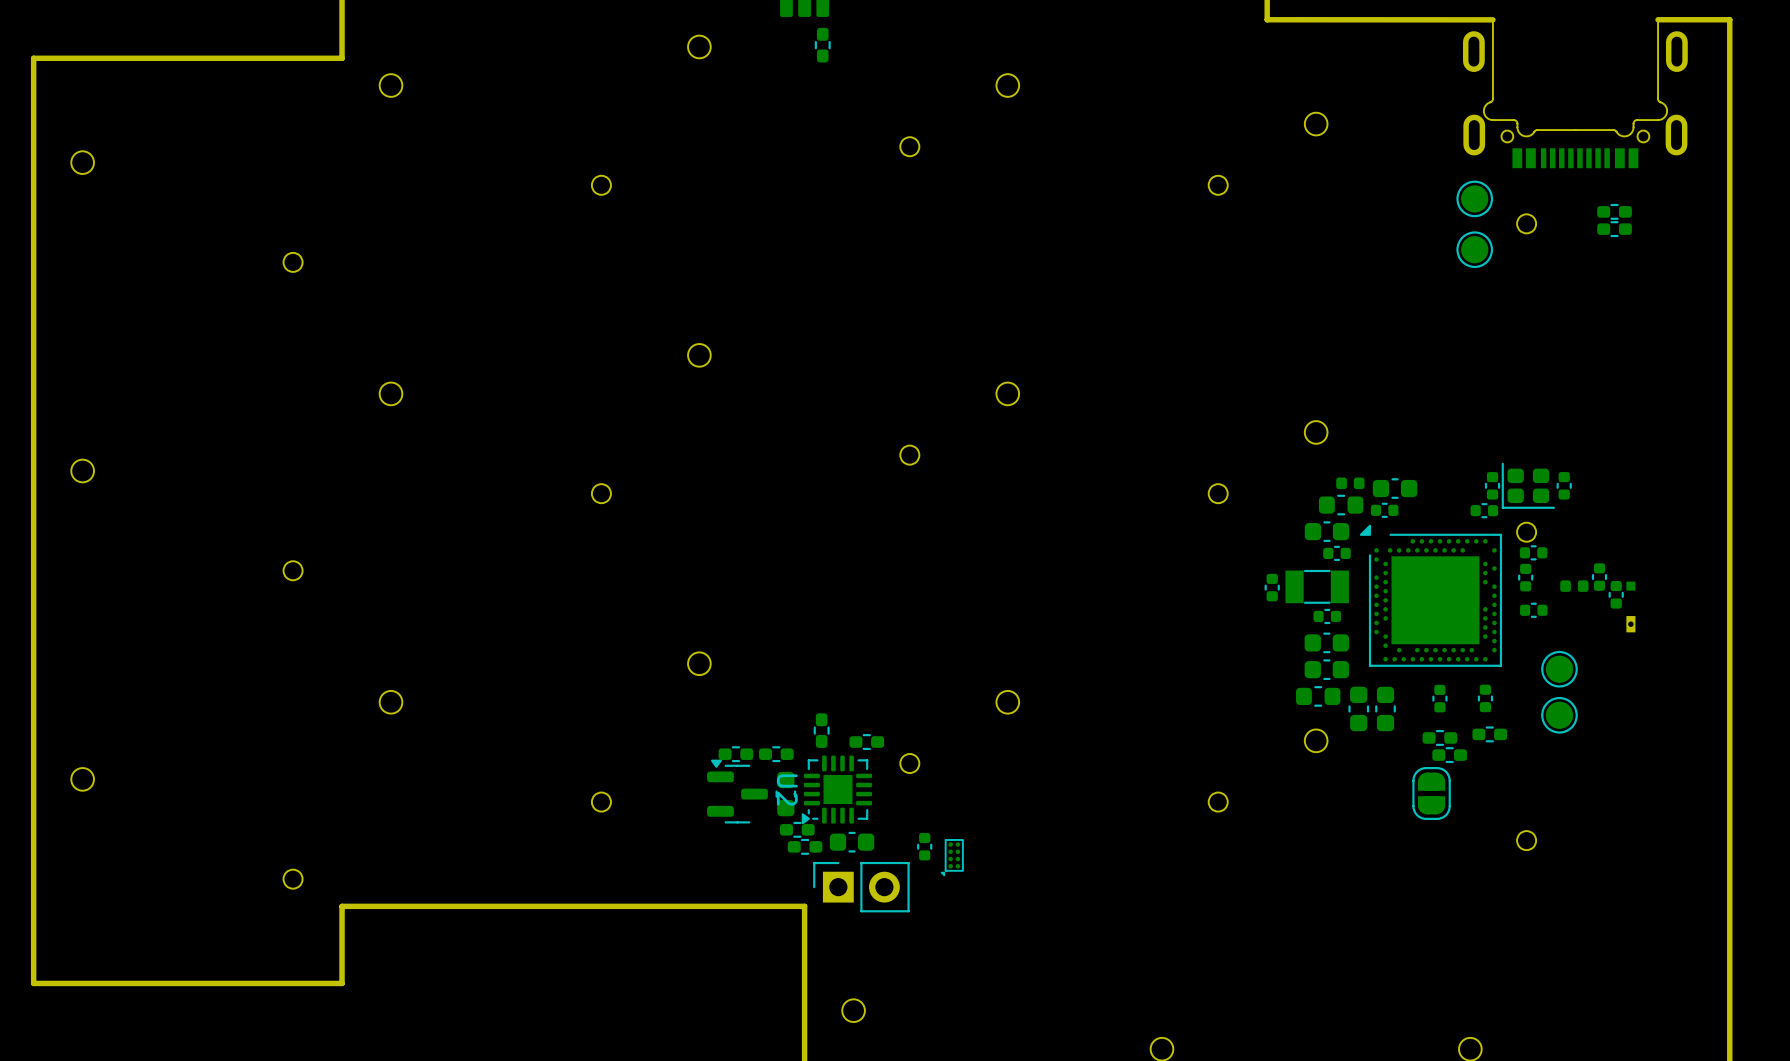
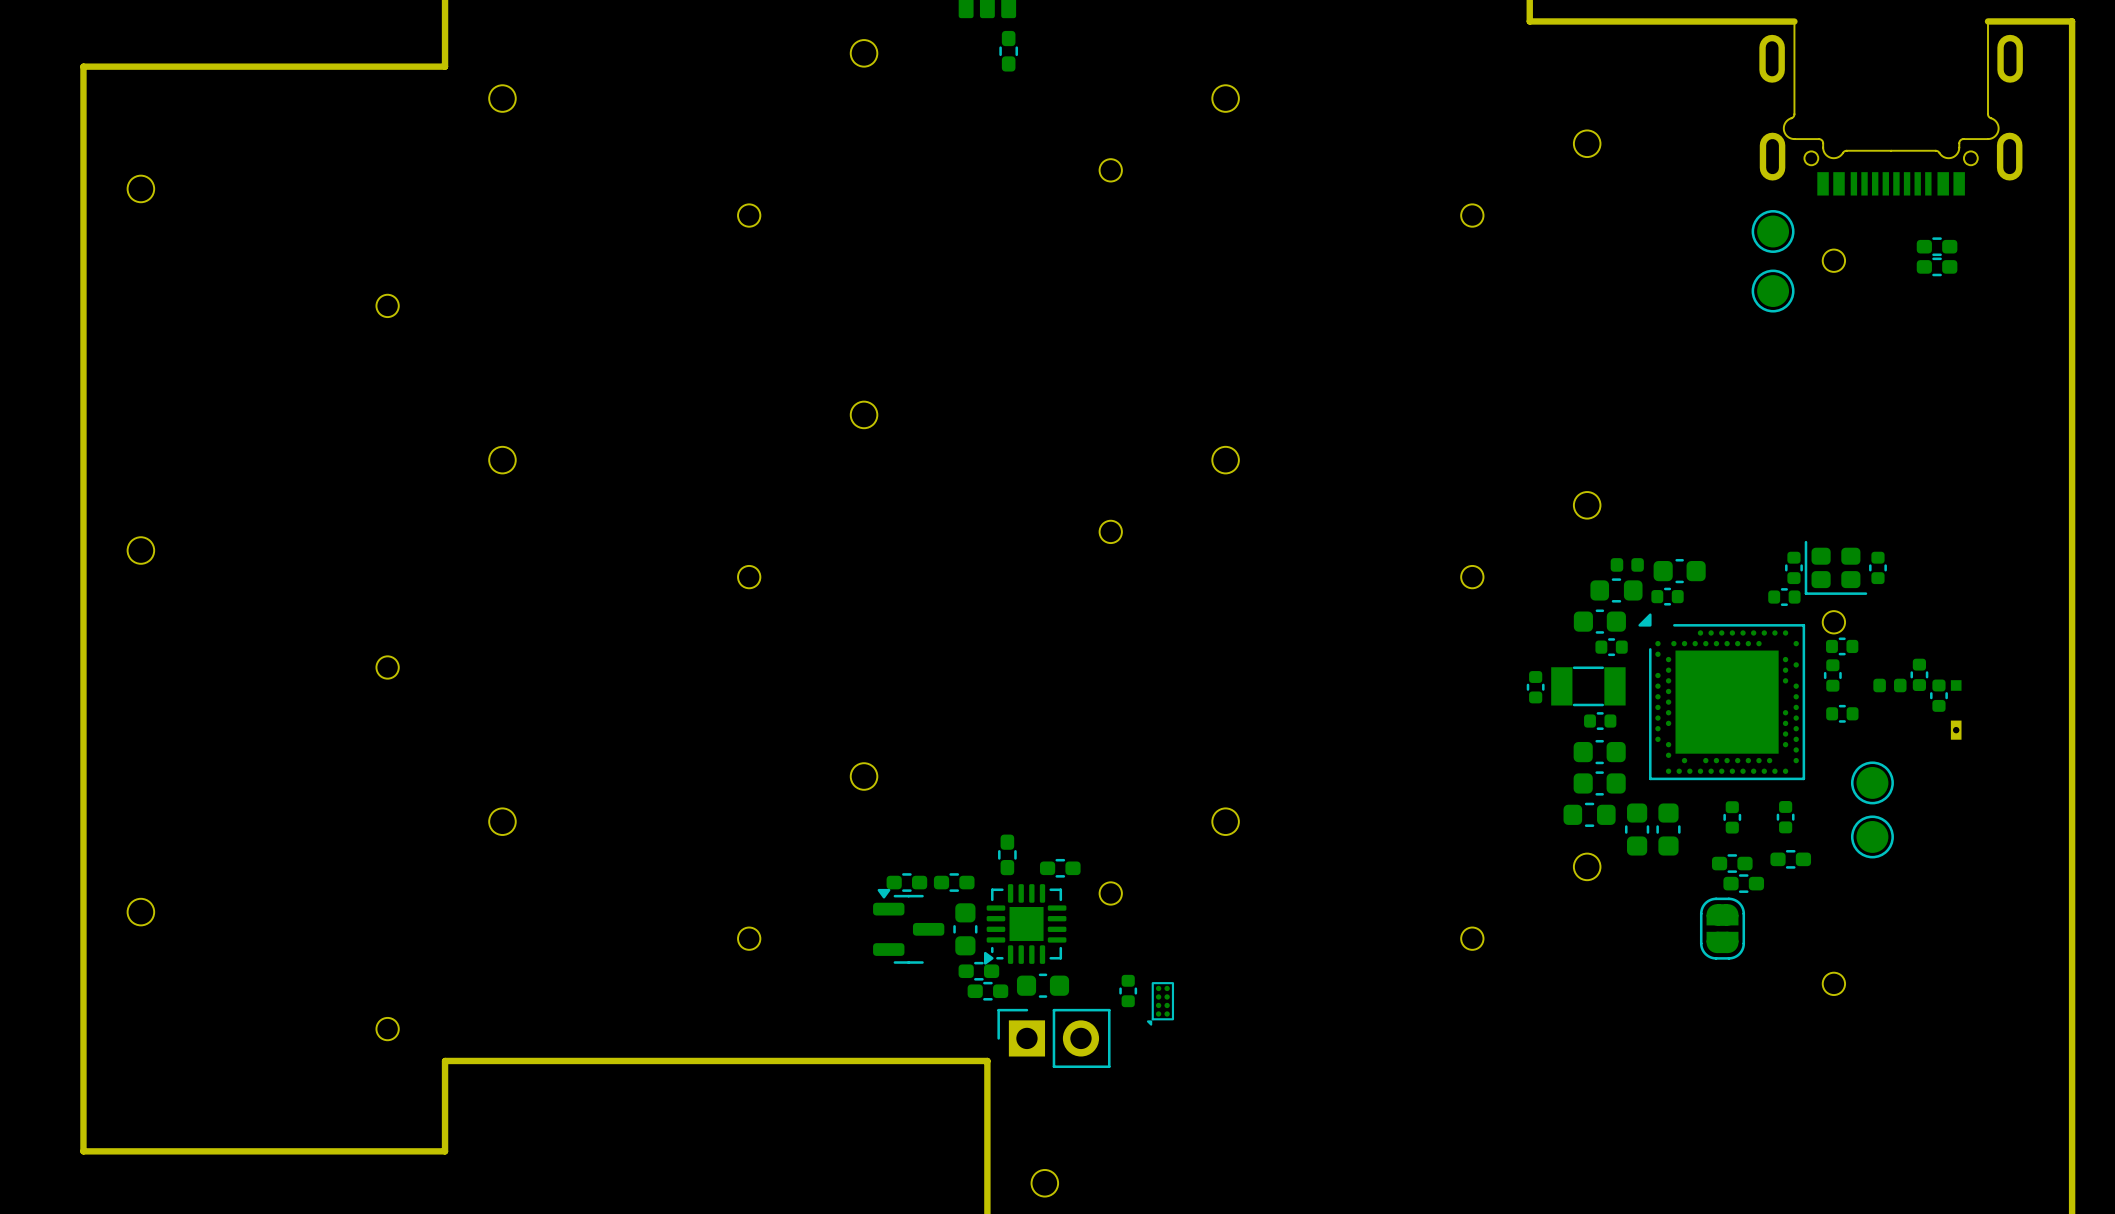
U2 name: U2 (787, 789) -> none

